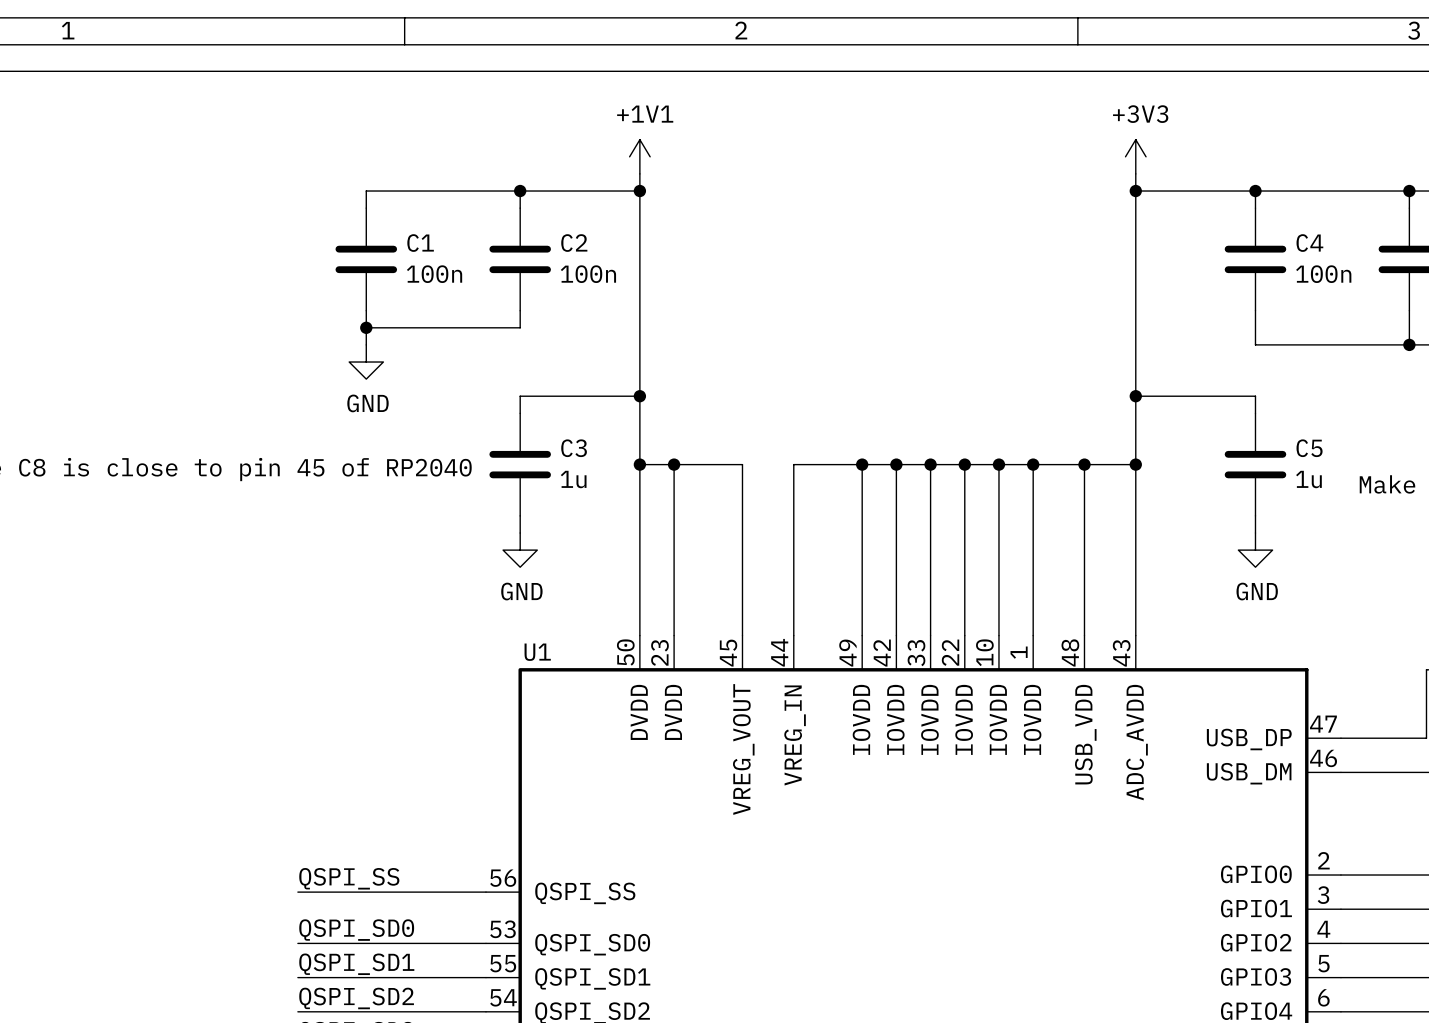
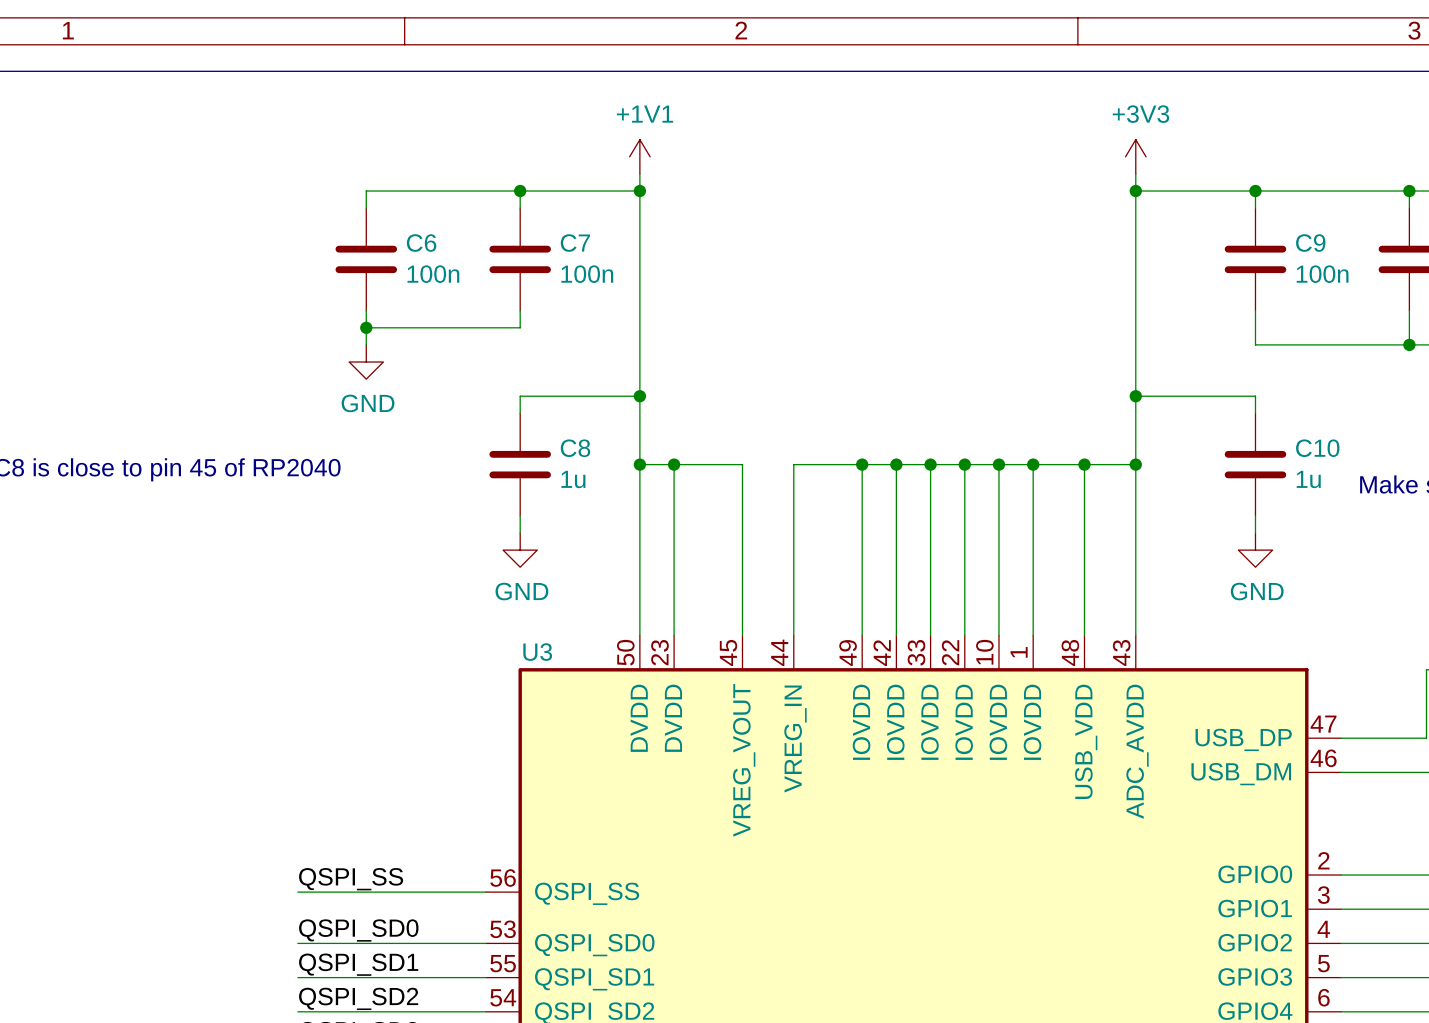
C1 name: C1 (420, 243) -> C6 (421, 243)
C2 name: C2 (574, 243) -> C7 (575, 243)
C4 name: C4 (1309, 243) -> C9 (1310, 243)
C3 name: C3 (574, 448) -> C8 (575, 448)
C5 name: C5 (1309, 448) -> C10 (1317, 448)
U1 name: U1 (537, 652) -> U3 (537, 652)

